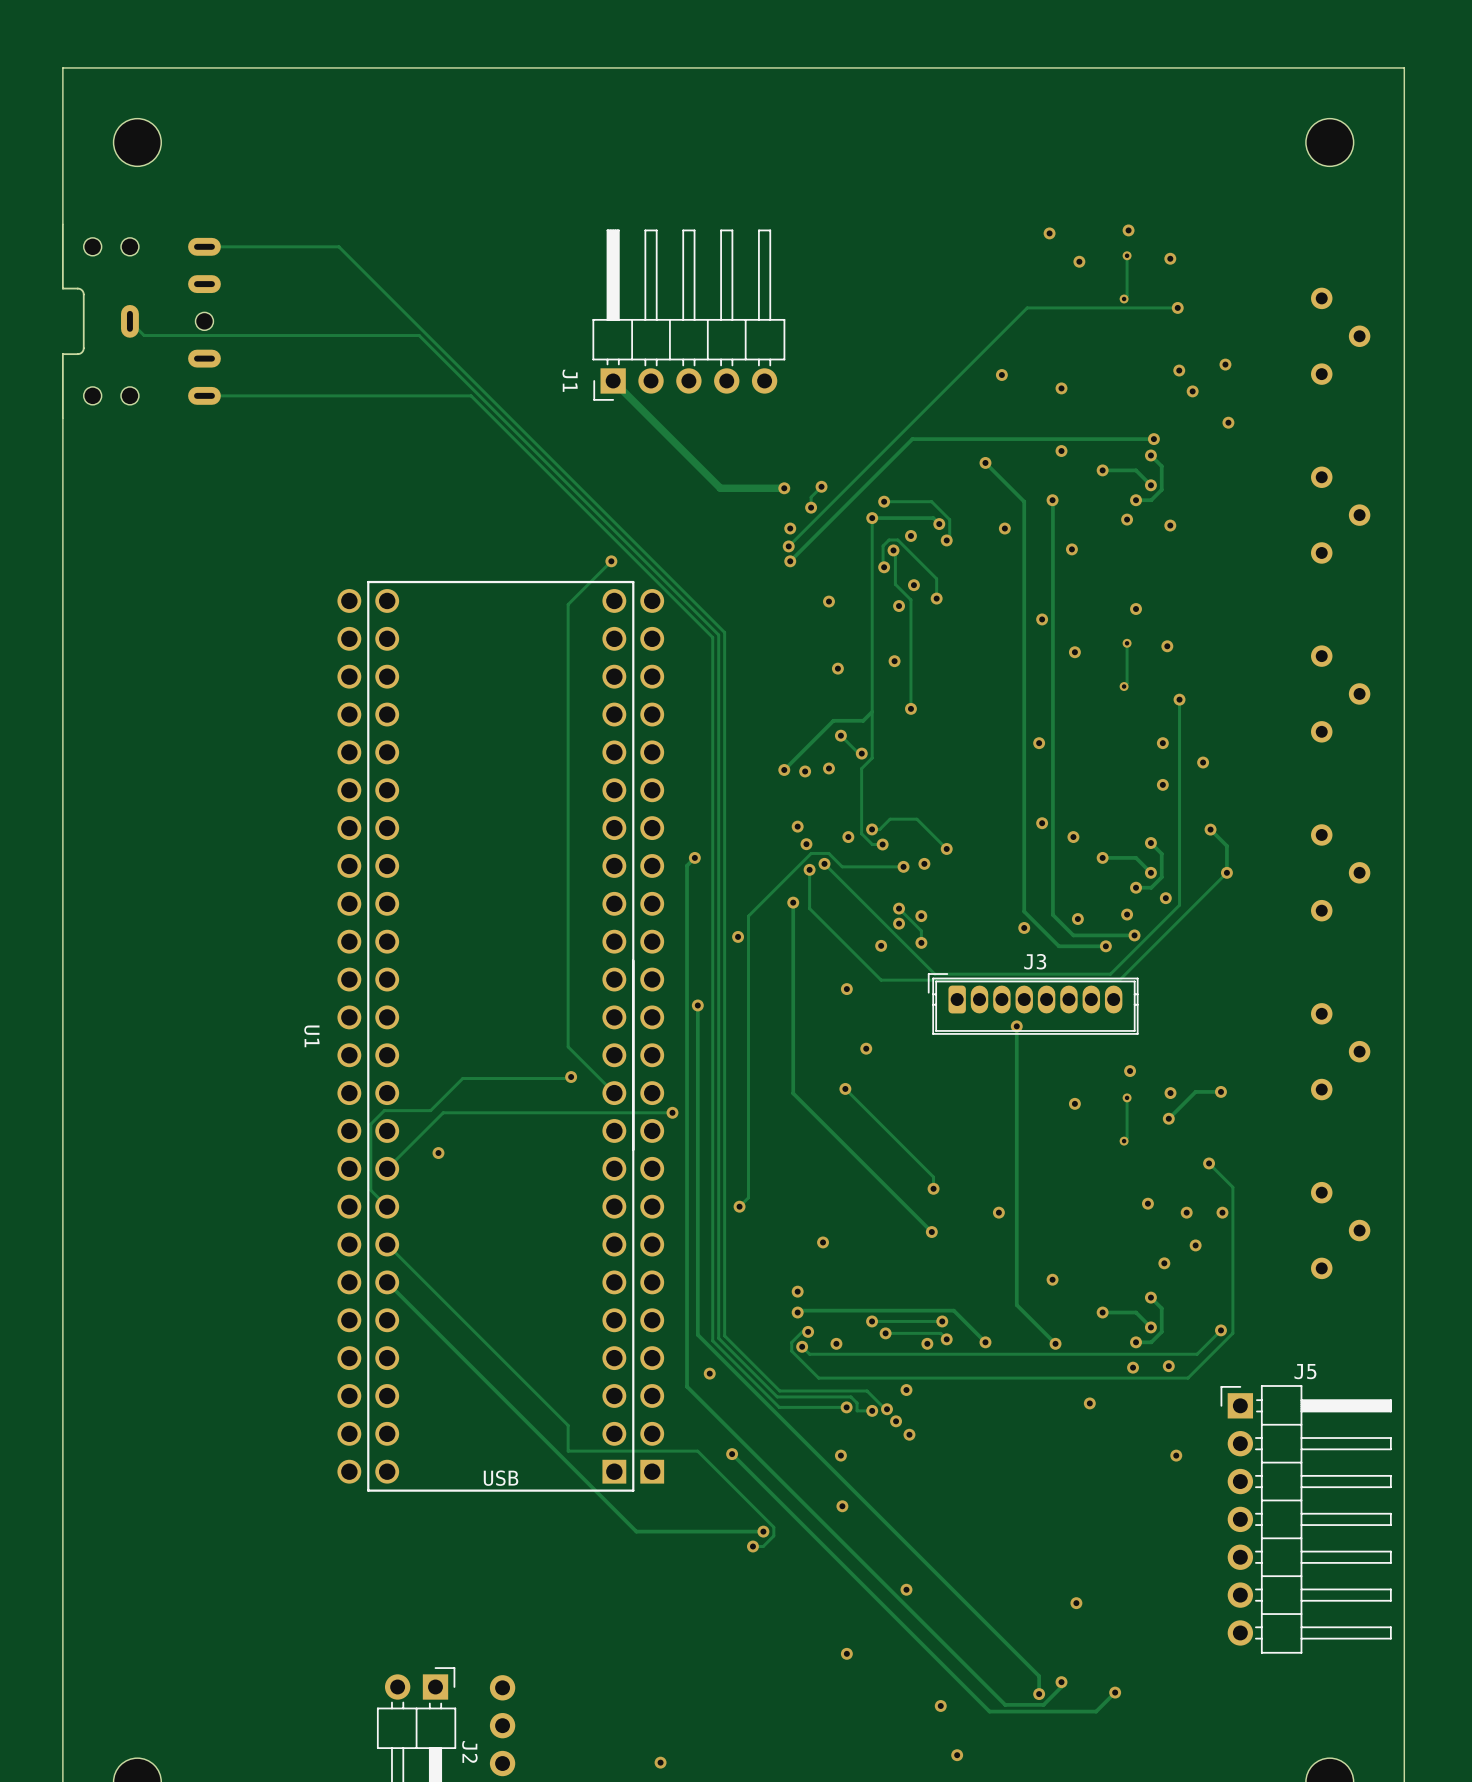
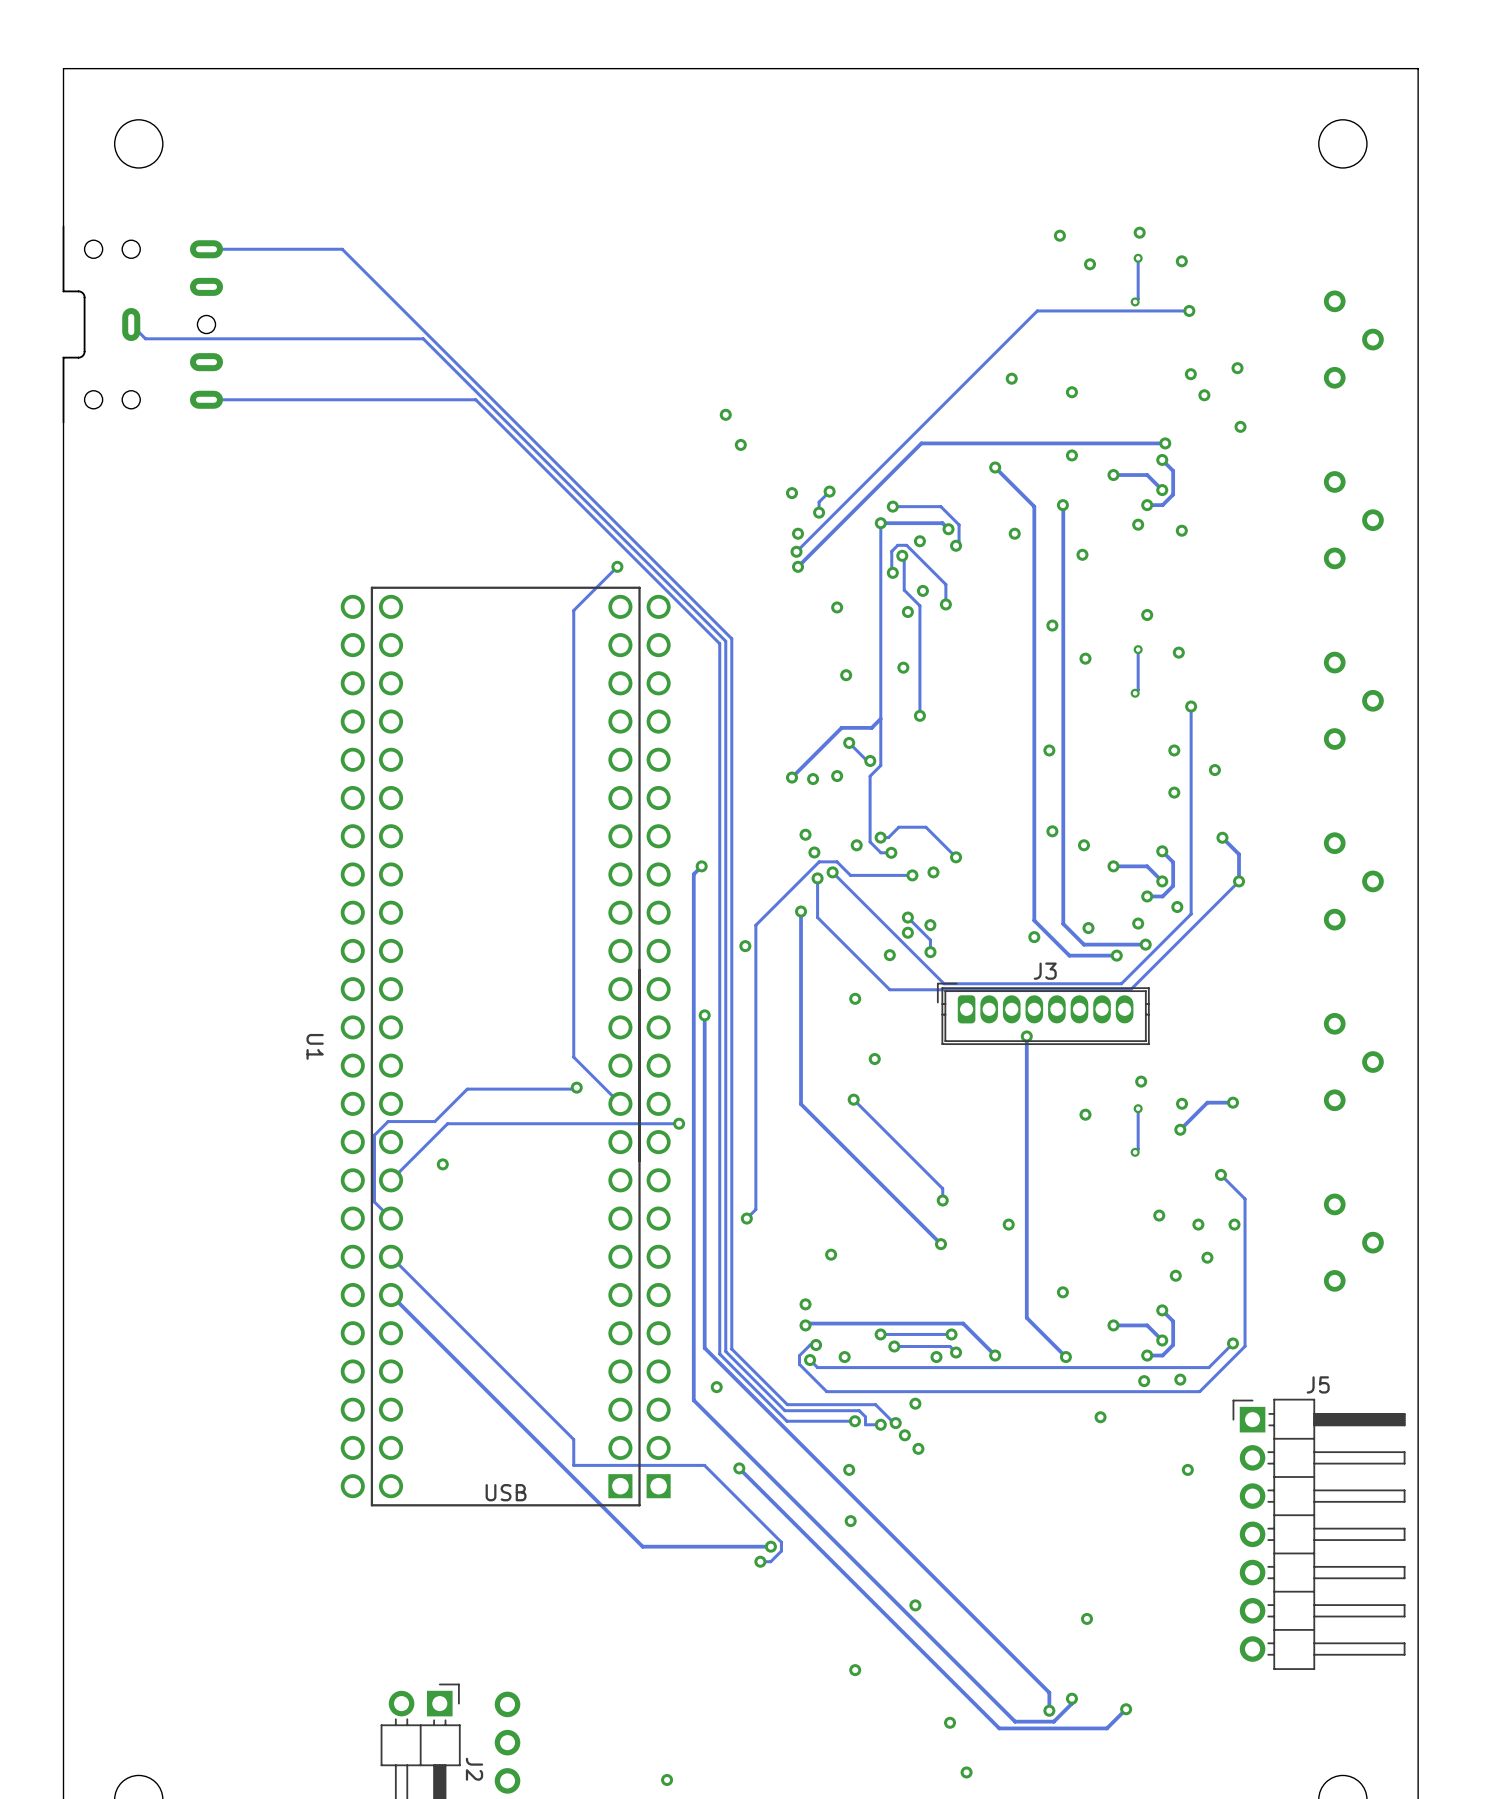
J1: (688, 315) -> none
track: (613, 380) (720, 488) (784, 488) -> none
via: none -> (725, 414)
via: none -> (740, 444)

